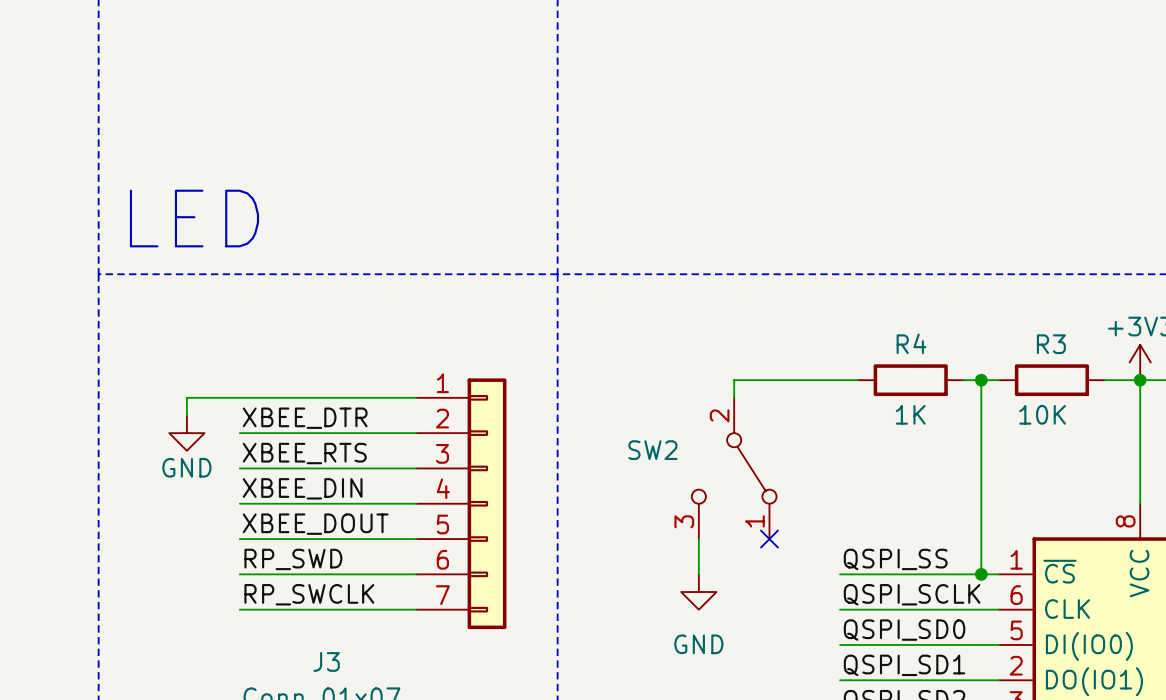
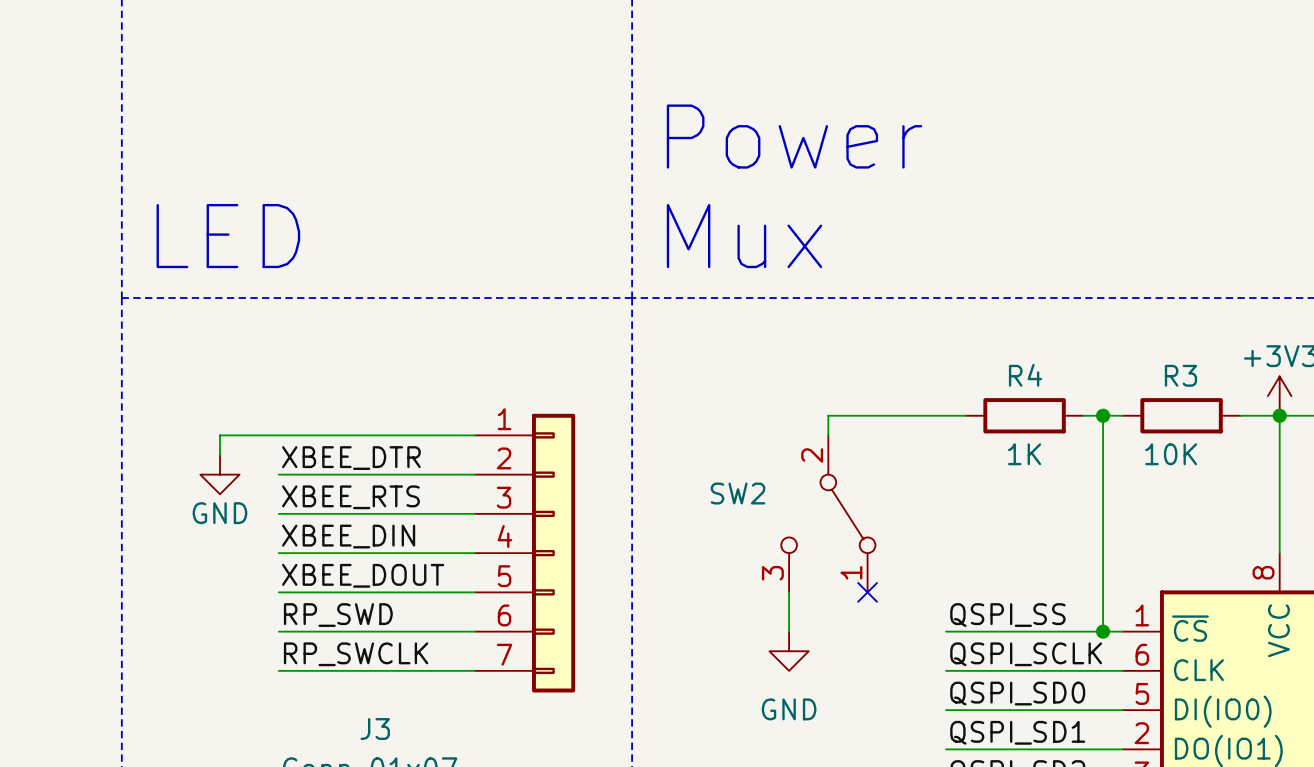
text: none -> Power (794, 136)
text: none -> Mux (744, 236)

